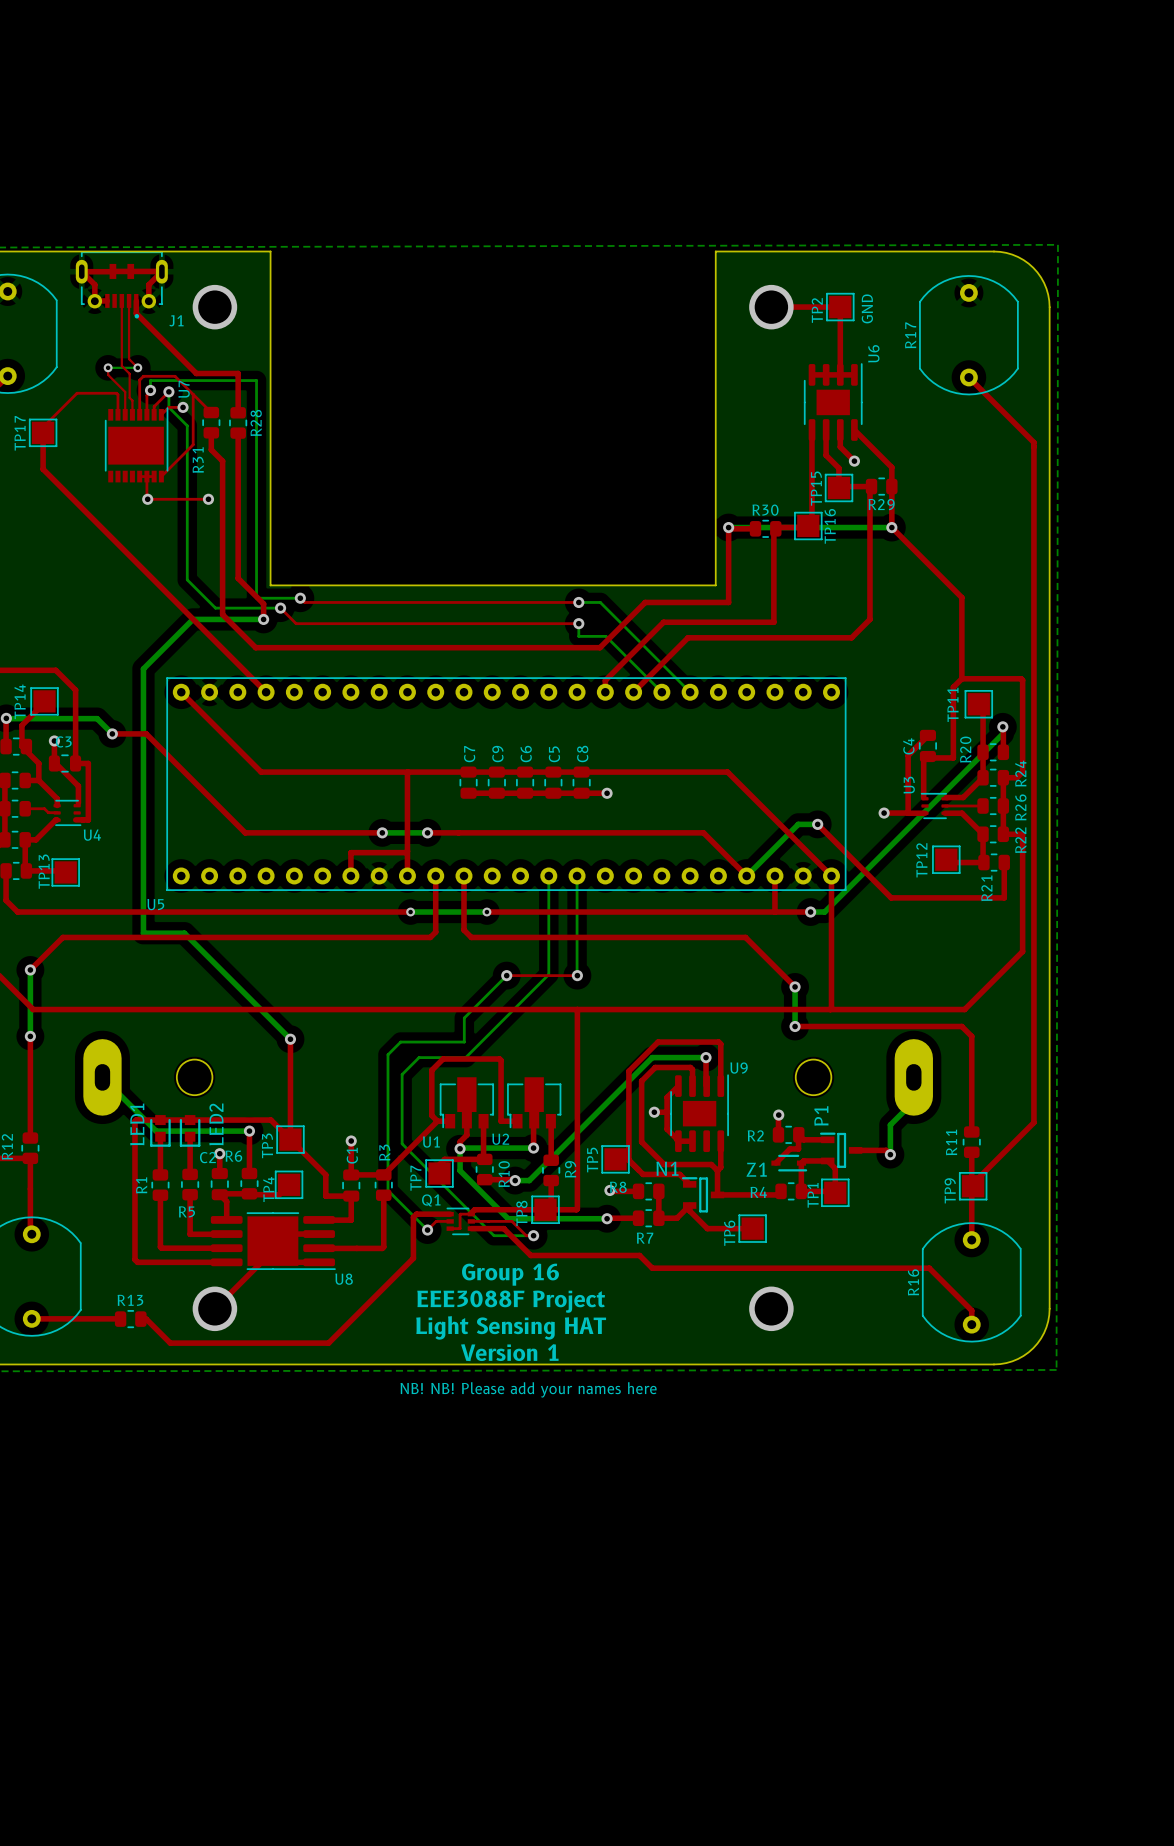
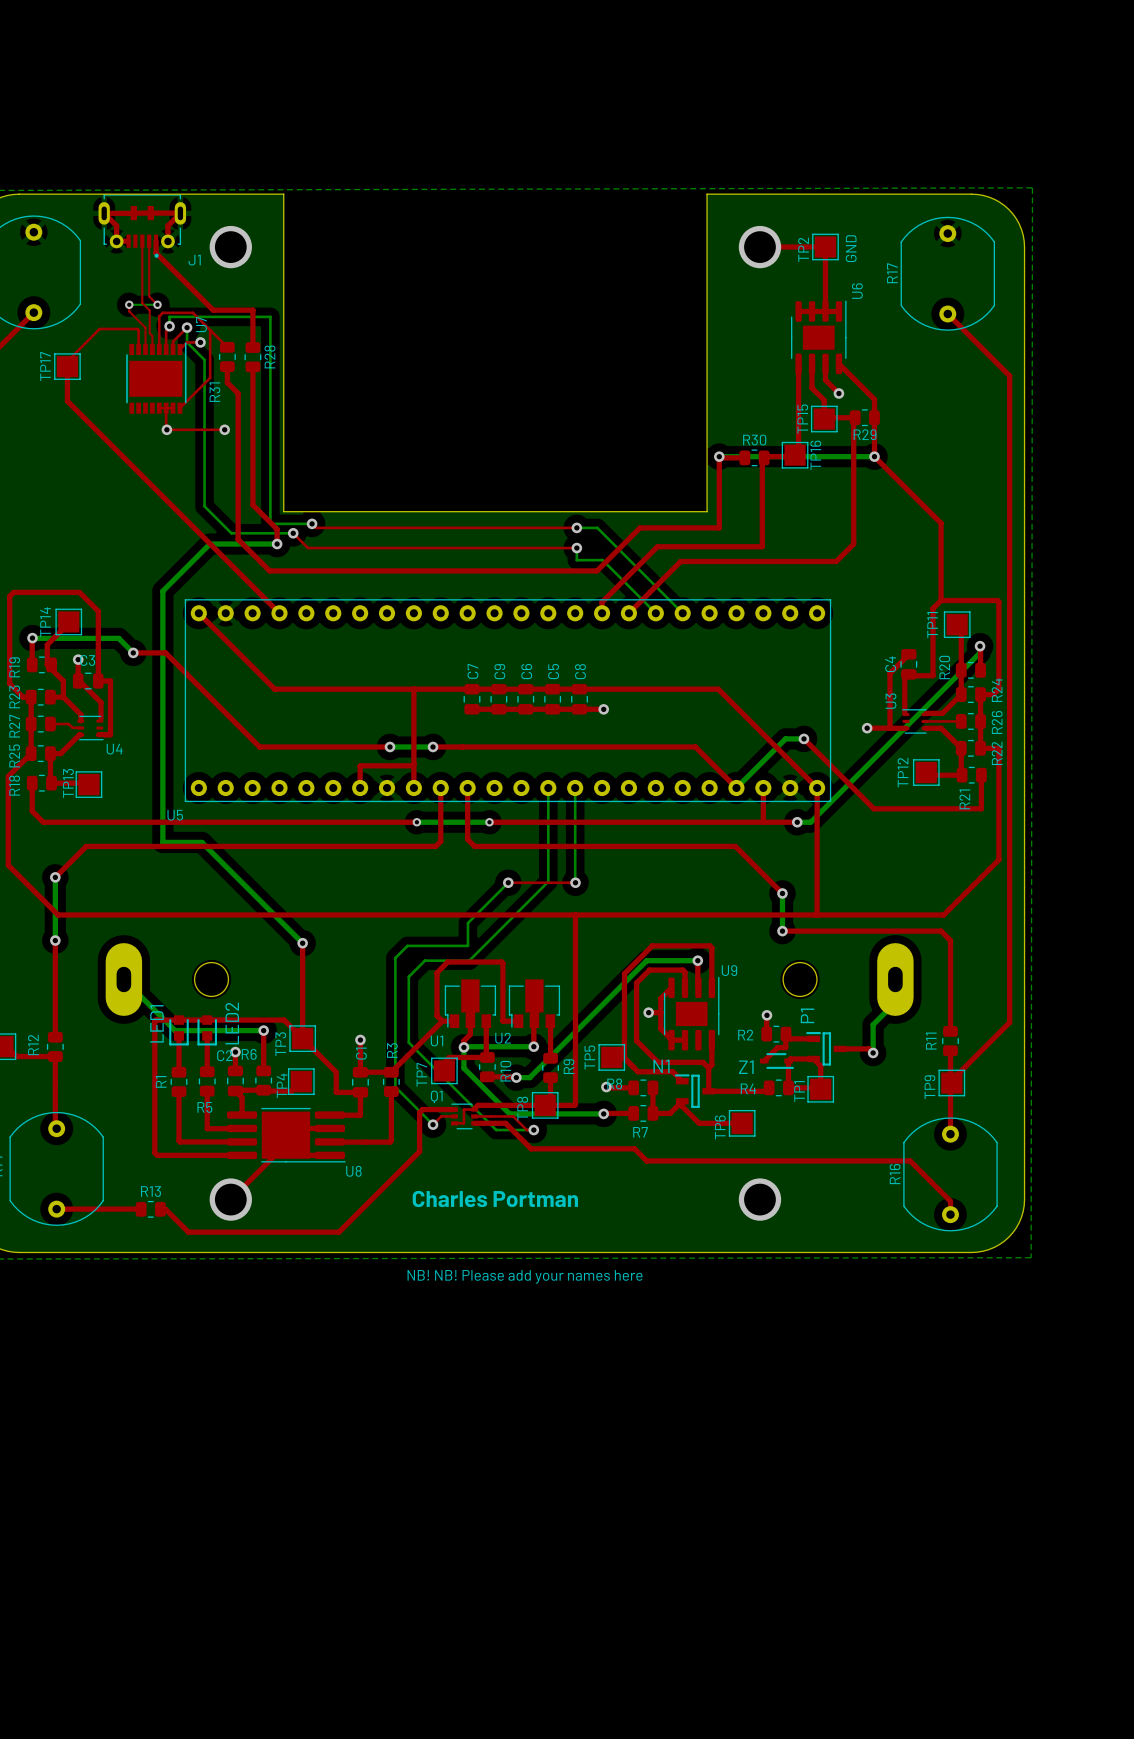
text: Group 16 (510, 1274) -> none
text: EEE3088F Project (511, 1301) -> none
text: none -> Charles Portman (495, 1198)
text: Light Sensing HAT (511, 1327) -> none
text: Version 1 (509, 1352) -> none

